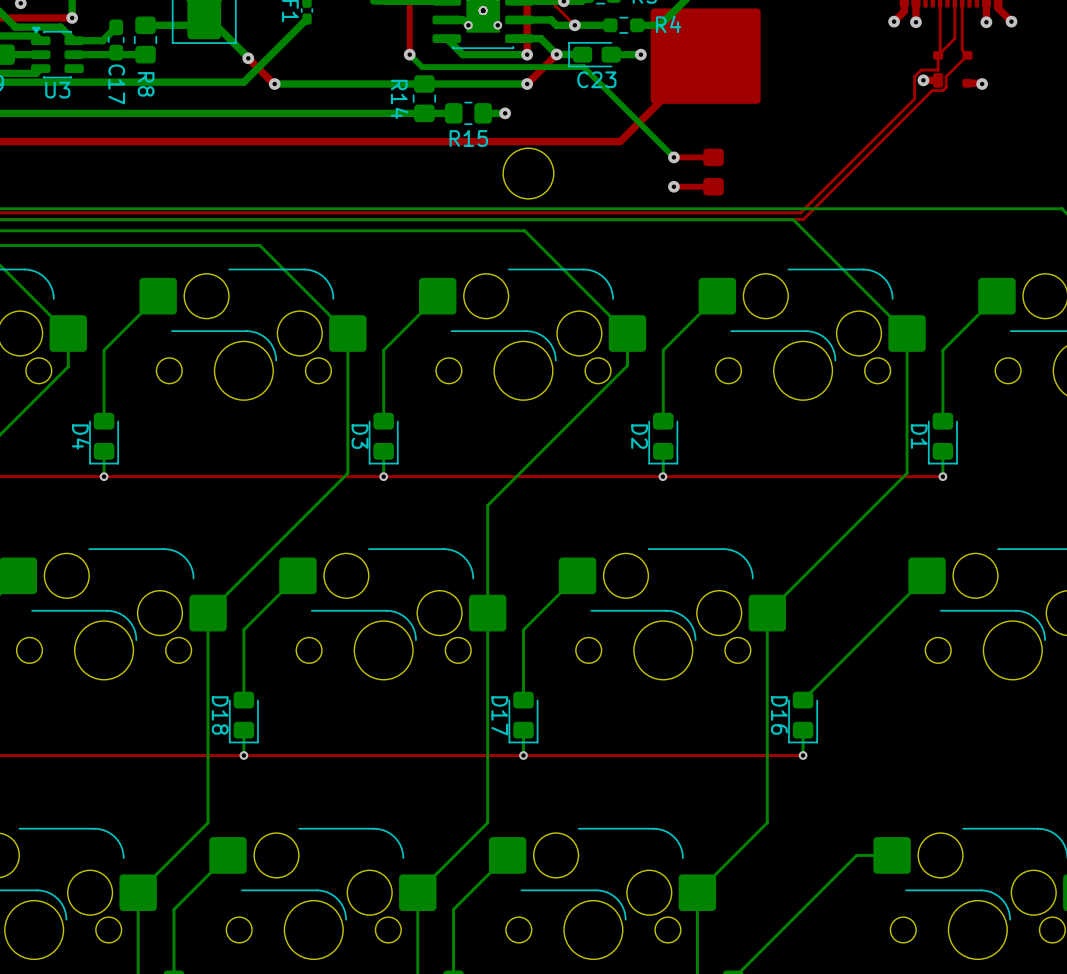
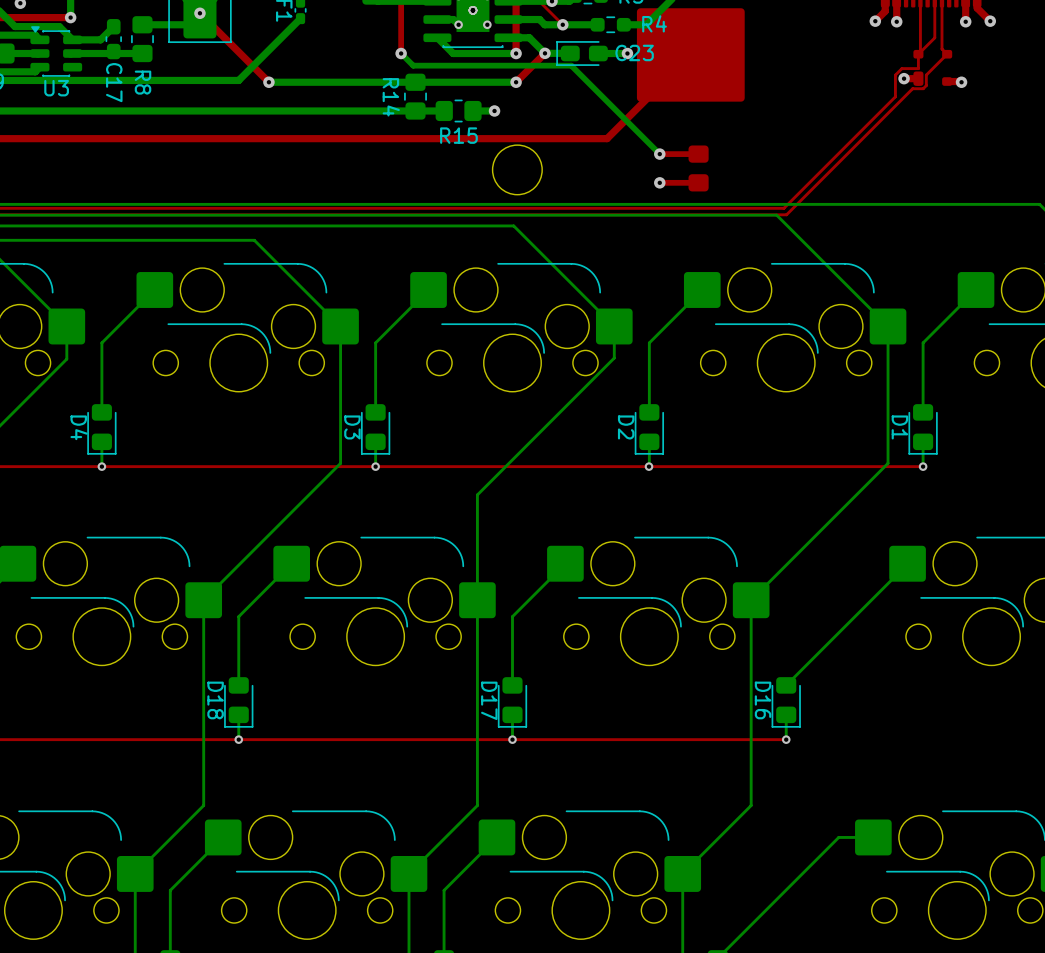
bottom track: (204, 13) (248, 58) -> none
top track: (248, 58) (274, 84) -> (199, 13) (268, 82)
via position: (248, 58) -> (199, 13)
C23 name position: C23 (596, 79) -> C23 (634, 52)

